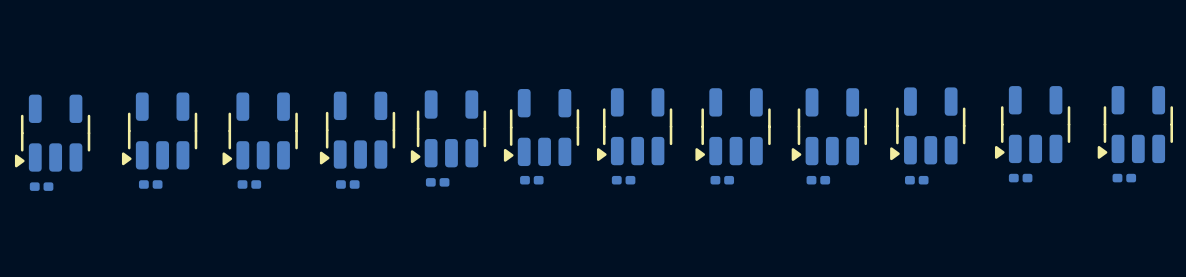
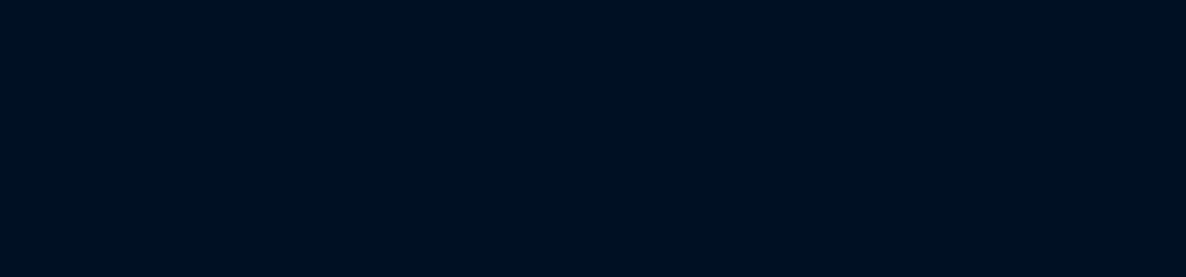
part: (1032, 124) -> none
part: (1135, 124) -> none
part: (927, 125) -> none
part: (634, 126) -> none
part: (733, 126) -> none
part: (829, 126) -> none
part: (541, 127) -> none
part: (448, 128) -> none
part: (357, 130) -> none
part: (159, 131) -> none
part: (260, 131) -> none
part: (52, 133) -> none
part: (1020, 178) -> none
part: (1124, 178) -> none
part: (531, 180) -> none
part: (623, 180) -> none
part: (722, 180) -> none
part: (818, 180) -> none
part: (916, 180) -> none
part: (437, 182) -> none
part: (150, 184) -> none
part: (249, 184) -> none
part: (347, 184) -> none
part: (41, 186) -> none

